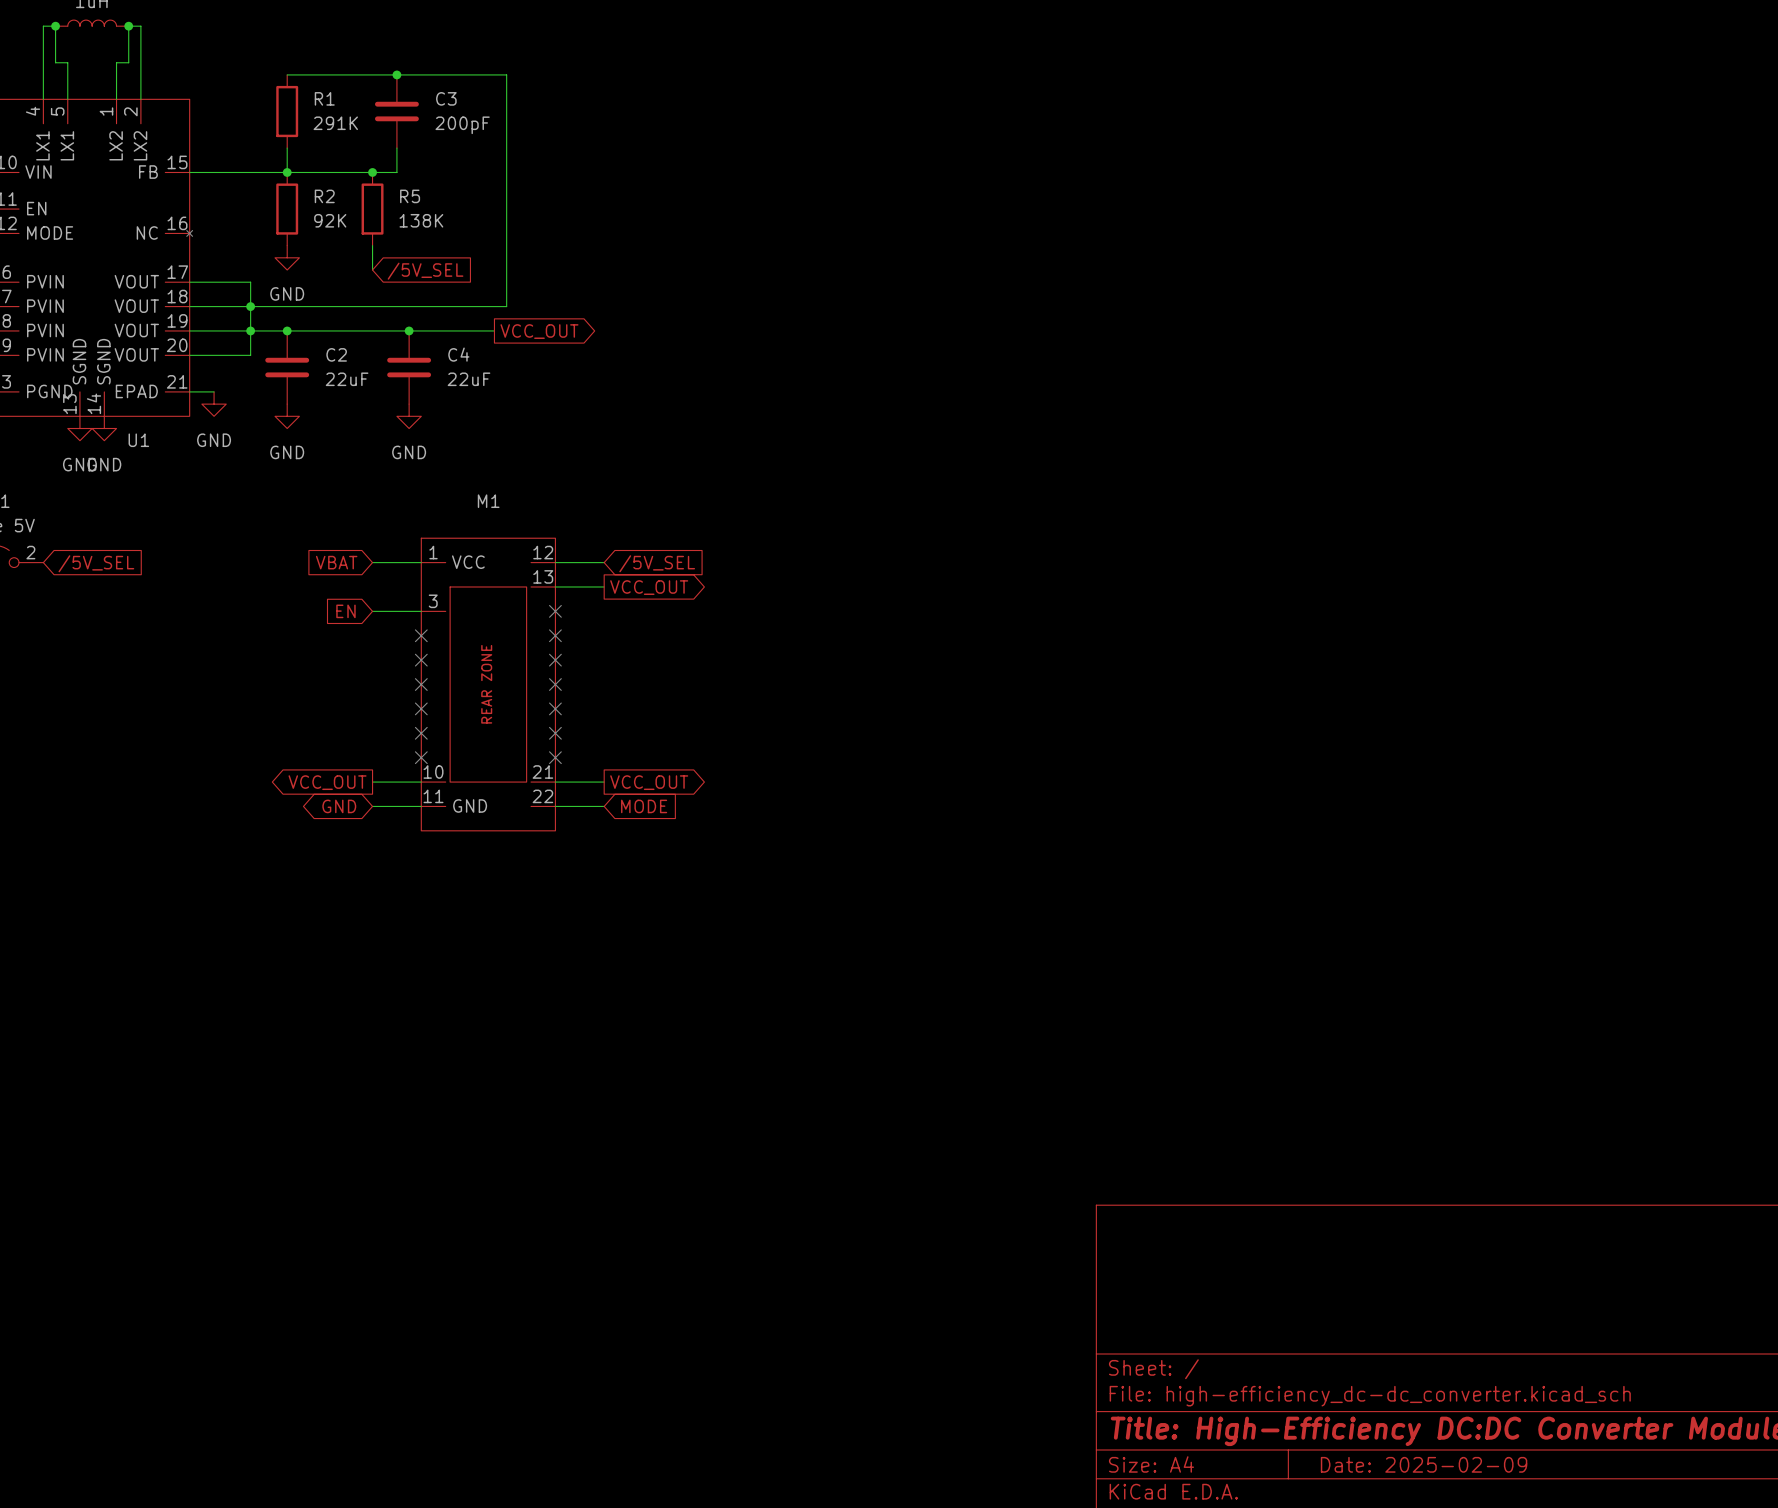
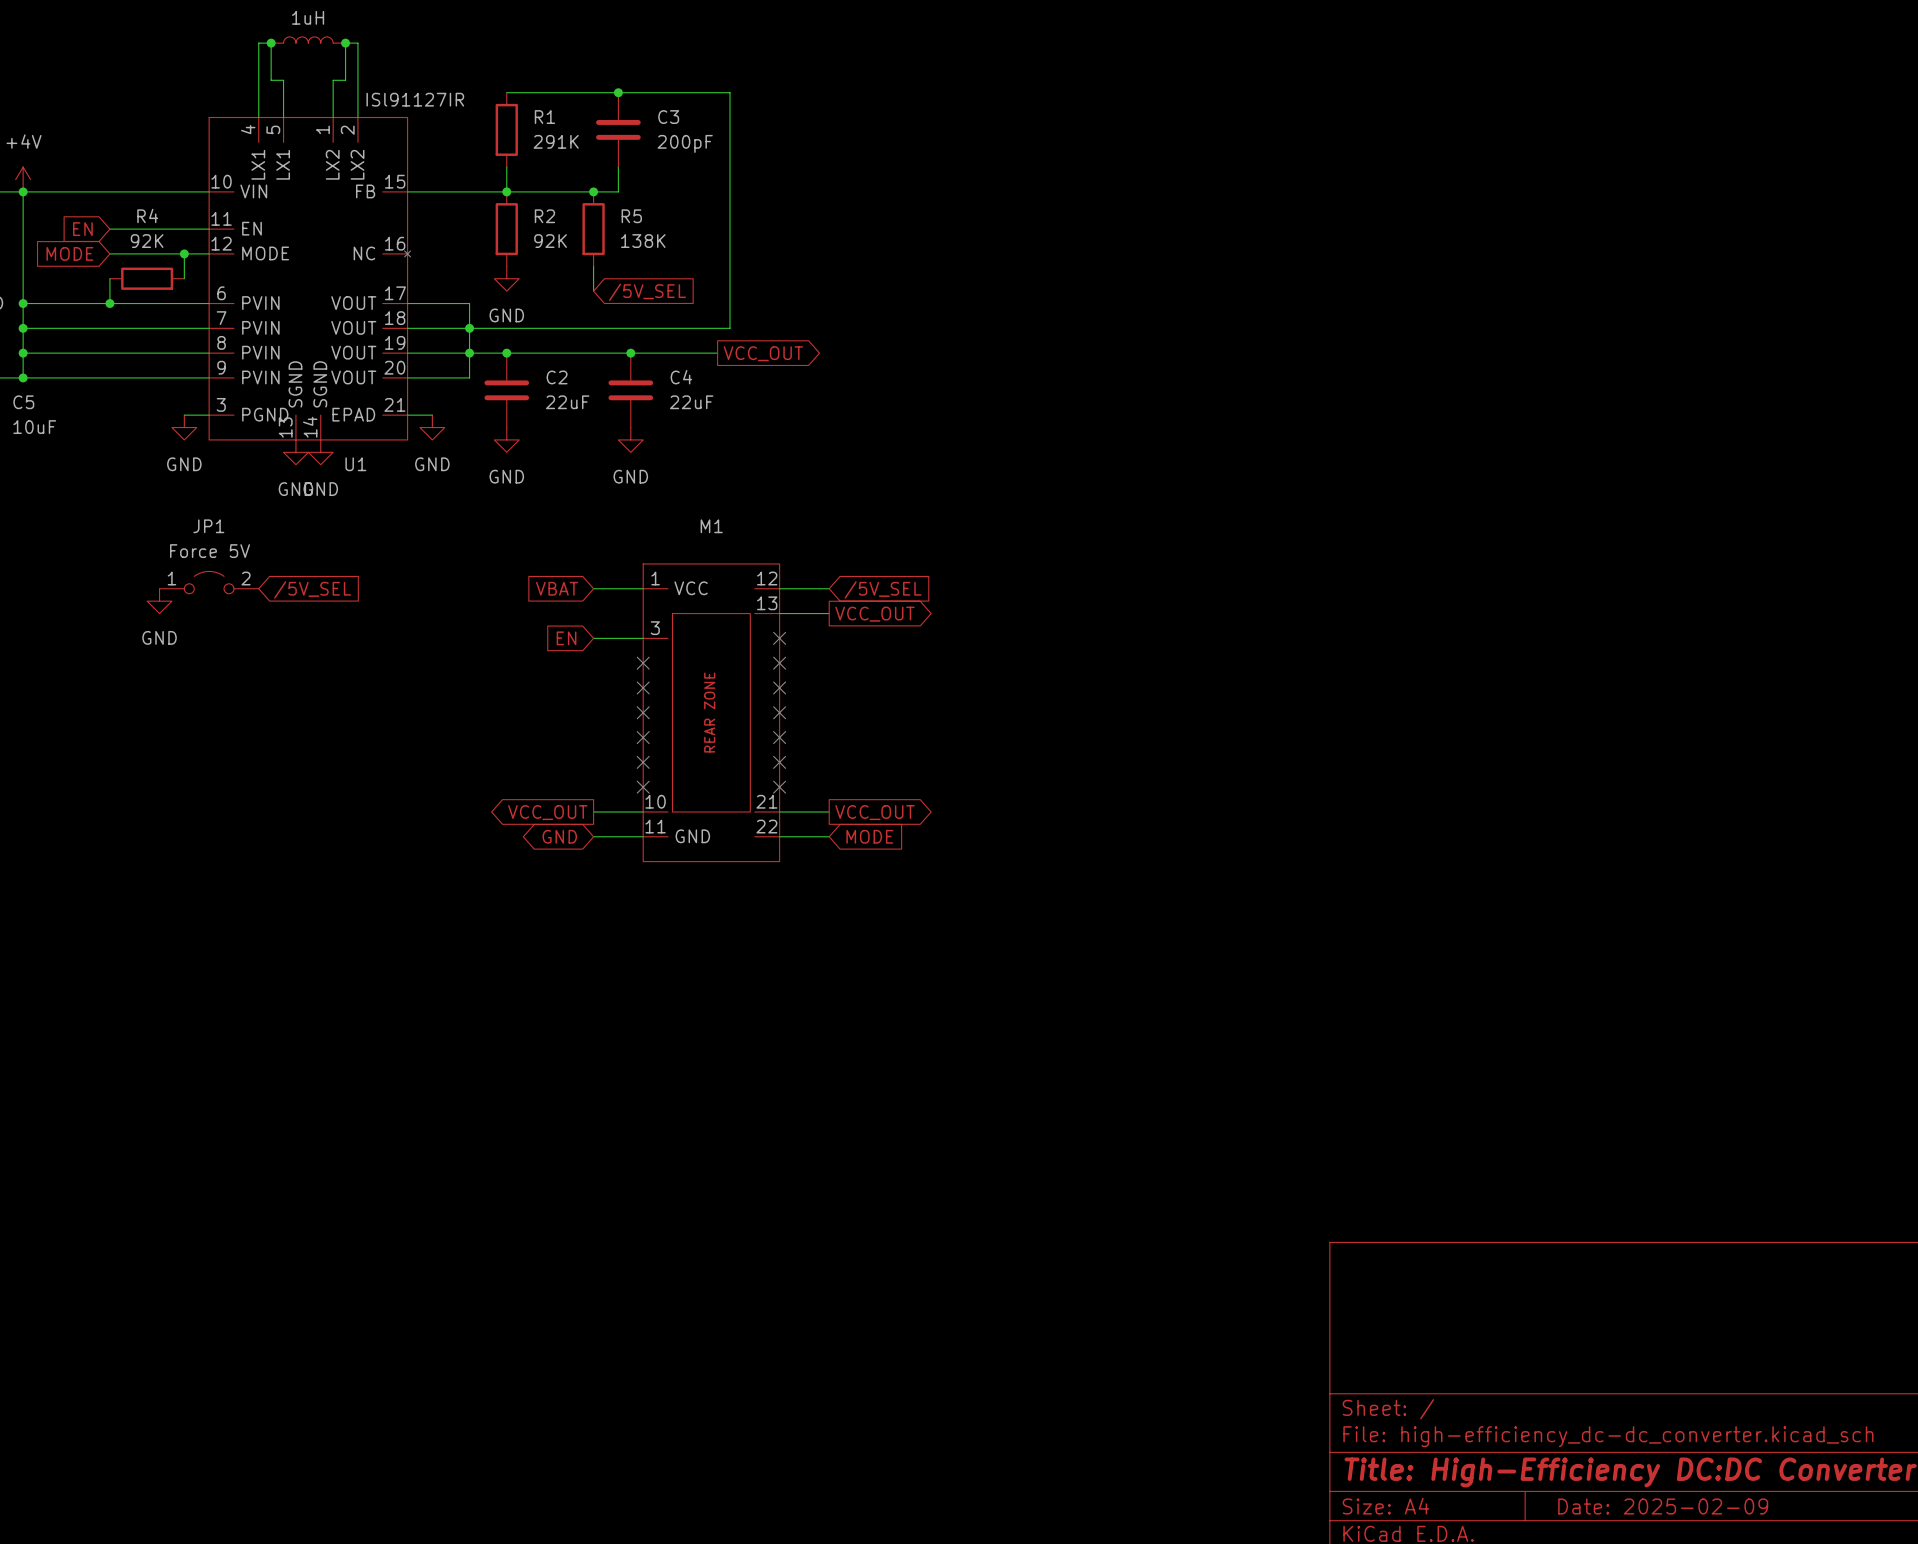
U1 value: none -> ISl91127IR (415, 99)

